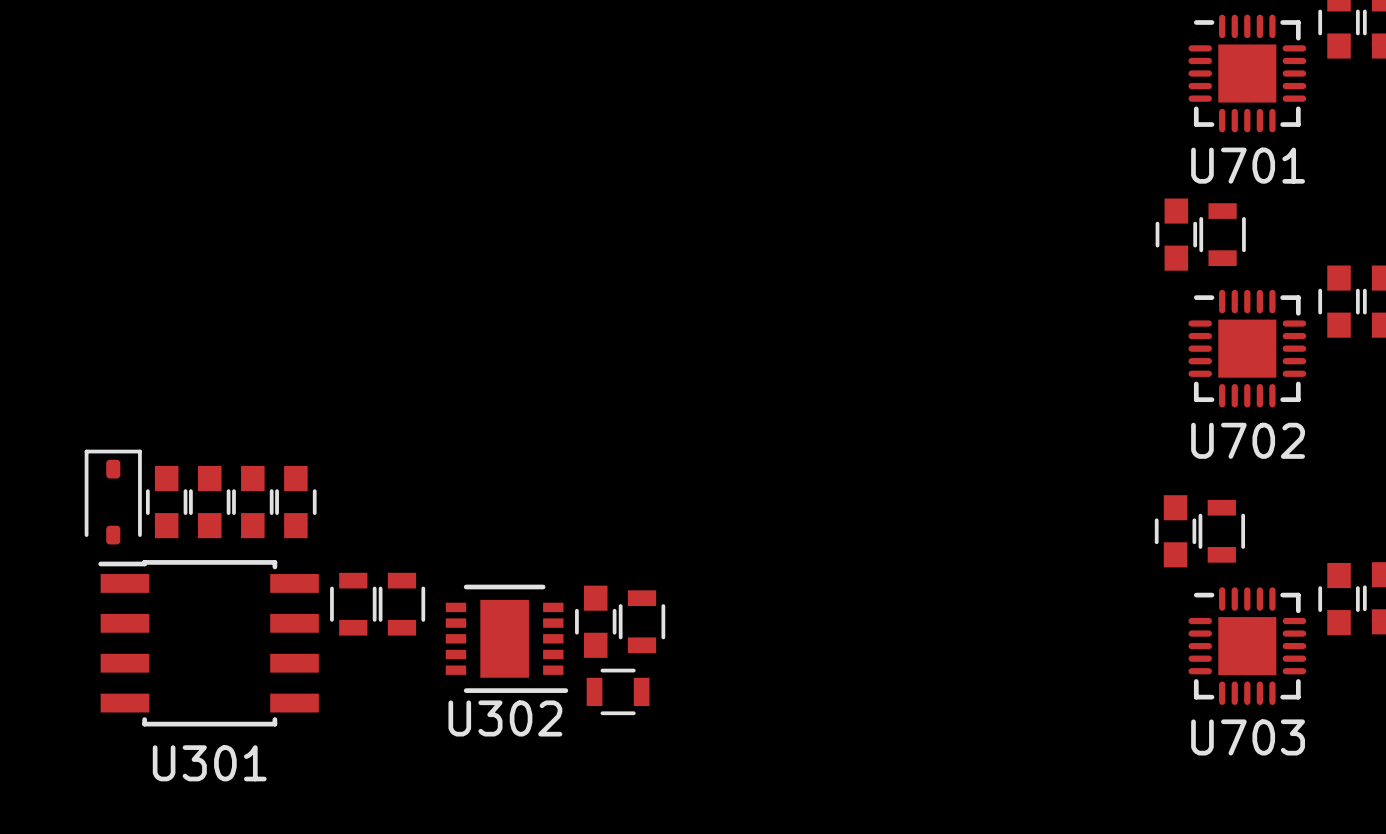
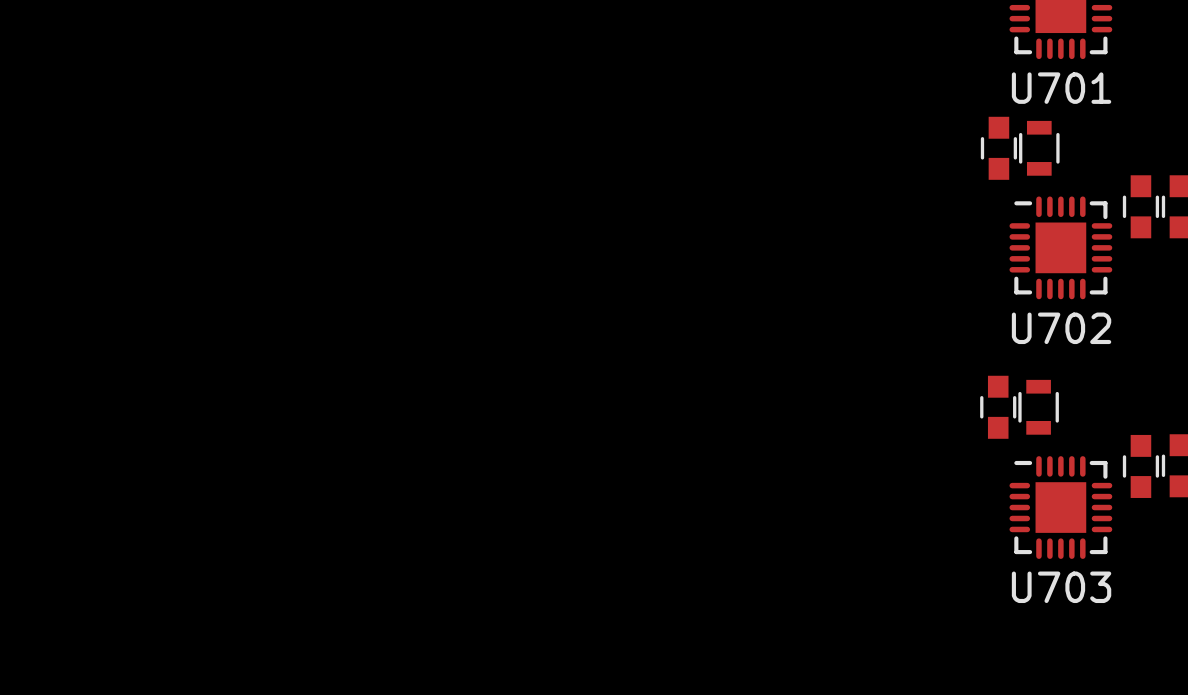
part: (113, 497) -> none
part: (166, 502) -> none
part: (209, 502) -> none
part: (252, 502) -> none
part: (295, 502) -> none
part: (353, 604) -> none
part: (401, 604) -> none
part: (595, 621) -> none
part: (642, 621) -> none
U302: (506, 638) -> none
U301: (208, 643) -> none
part: (618, 691) -> none

